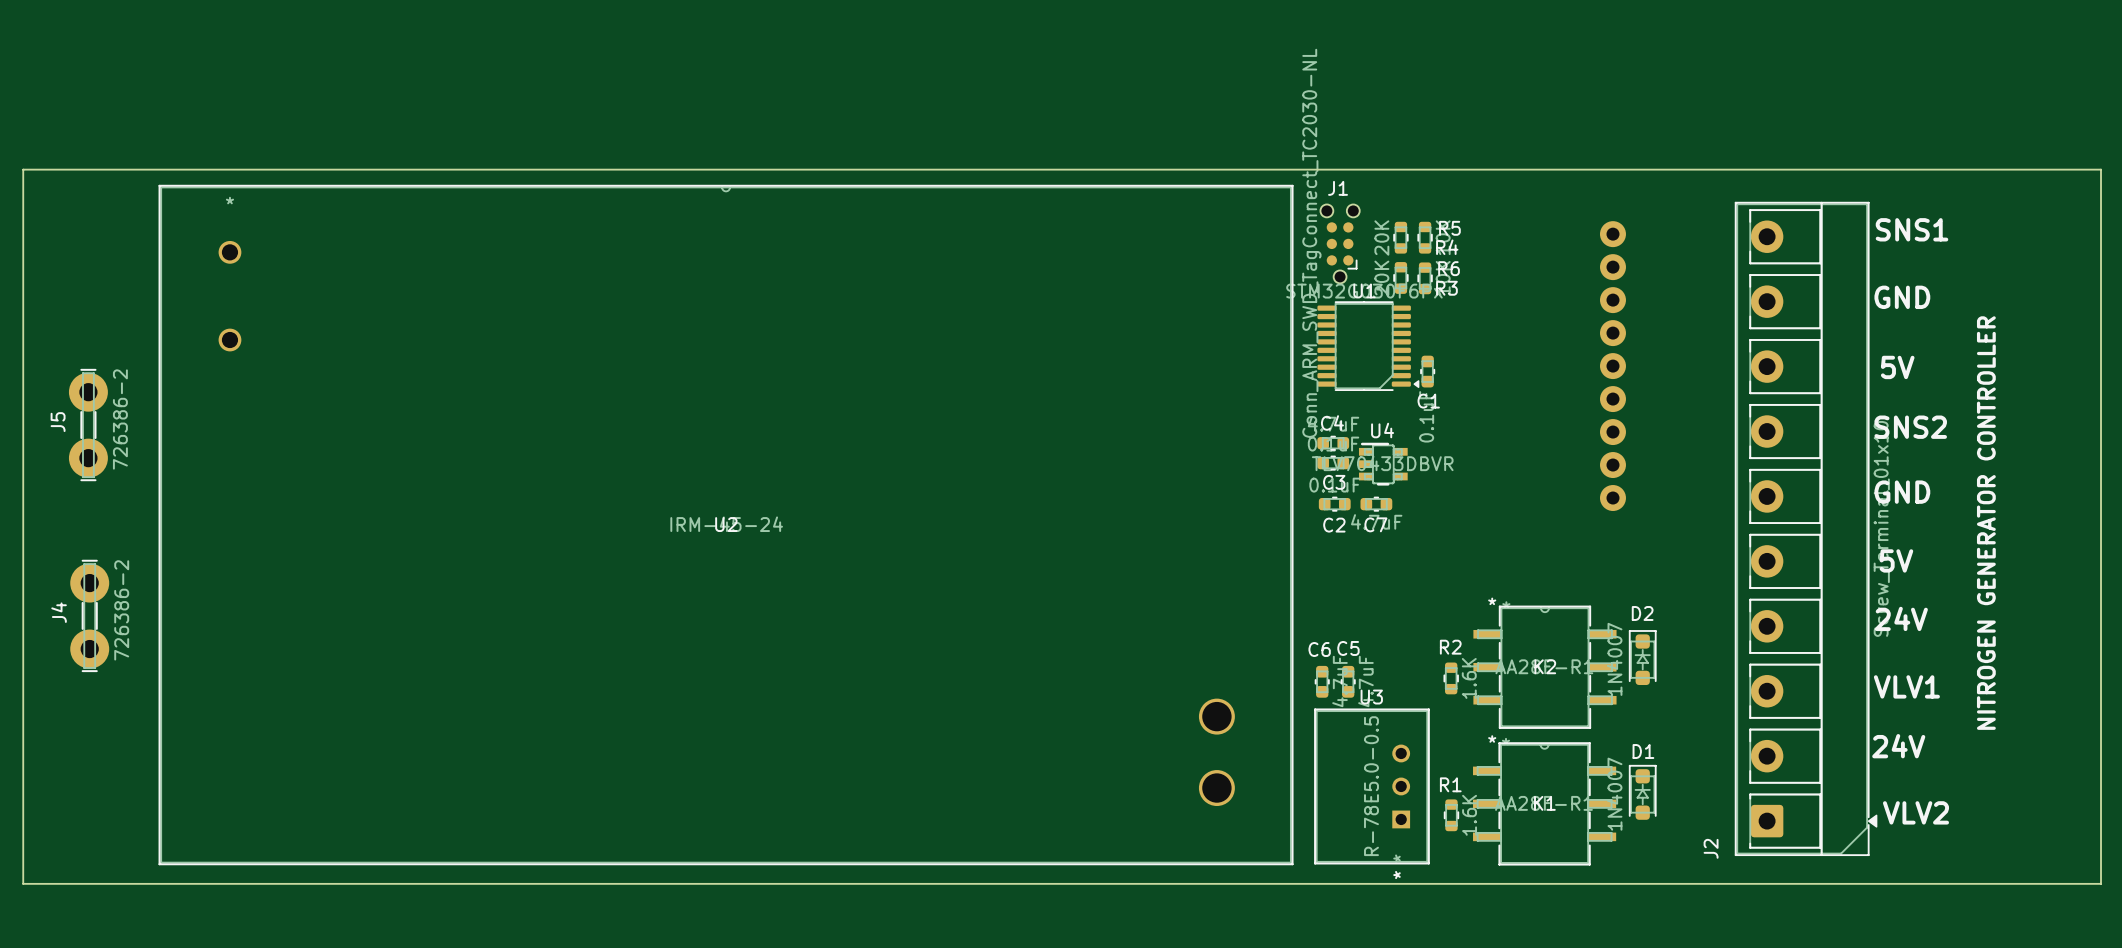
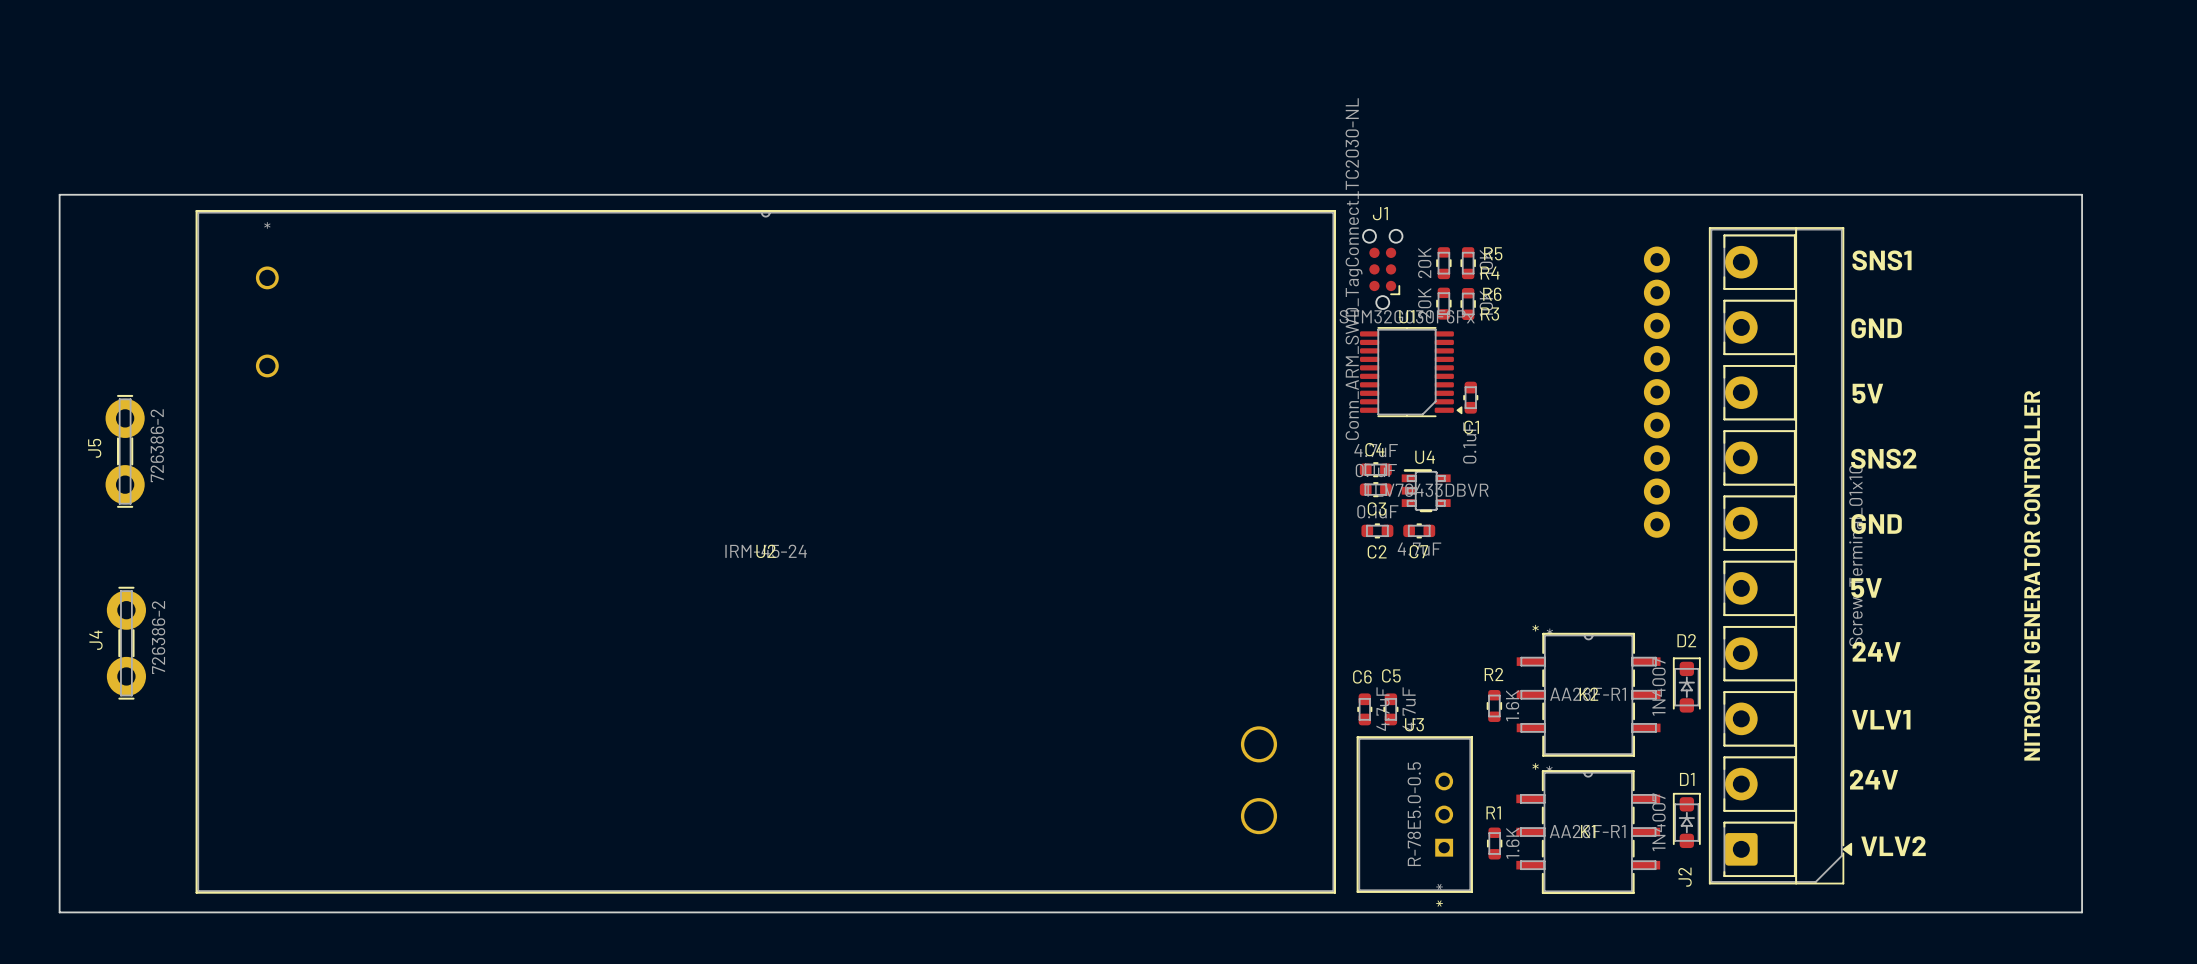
board edge: (2036, 169) (2101, 169) (2101, 883) (2036, 883) -> (2082, 194) (2082, 912)
text position: SNS1 (1912, 229) -> SNS1 (1881, 260)
text position: GND (1902, 297) -> GND (1876, 328)
text position: 5V (1897, 367) -> 5V (1867, 393)
text position: SNS2 (1910, 427) -> SNS2 (1883, 458)
text position: GND (1902, 492) -> GND (1876, 524)
J2 position: (1806, 528) -> (1780, 555)
text position: 5V (1896, 560) -> 5V (1866, 588)
text position: 24V (1901, 618) -> 24V (1876, 651)
text position: VLV1 (1906, 686) -> VLV1 (1881, 719)
text position: 24V (1898, 746) -> 24V (1873, 779)
text position: VLV2 (1915, 812) -> VLV2 (1893, 846)

